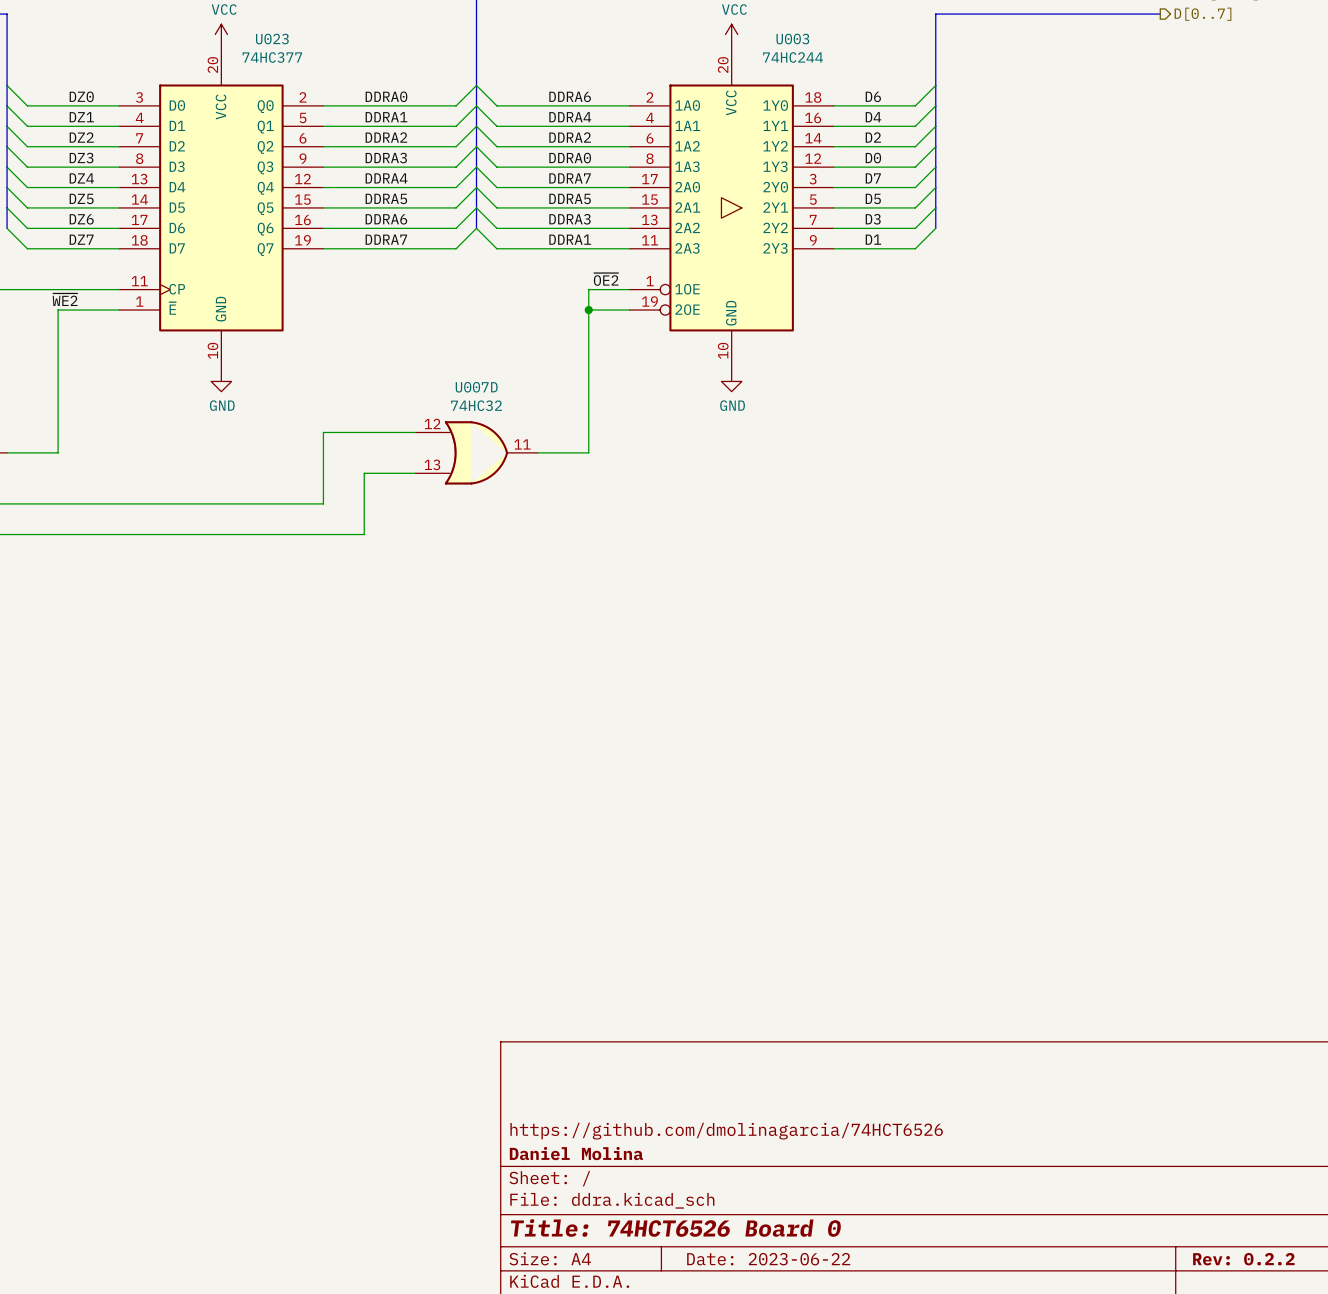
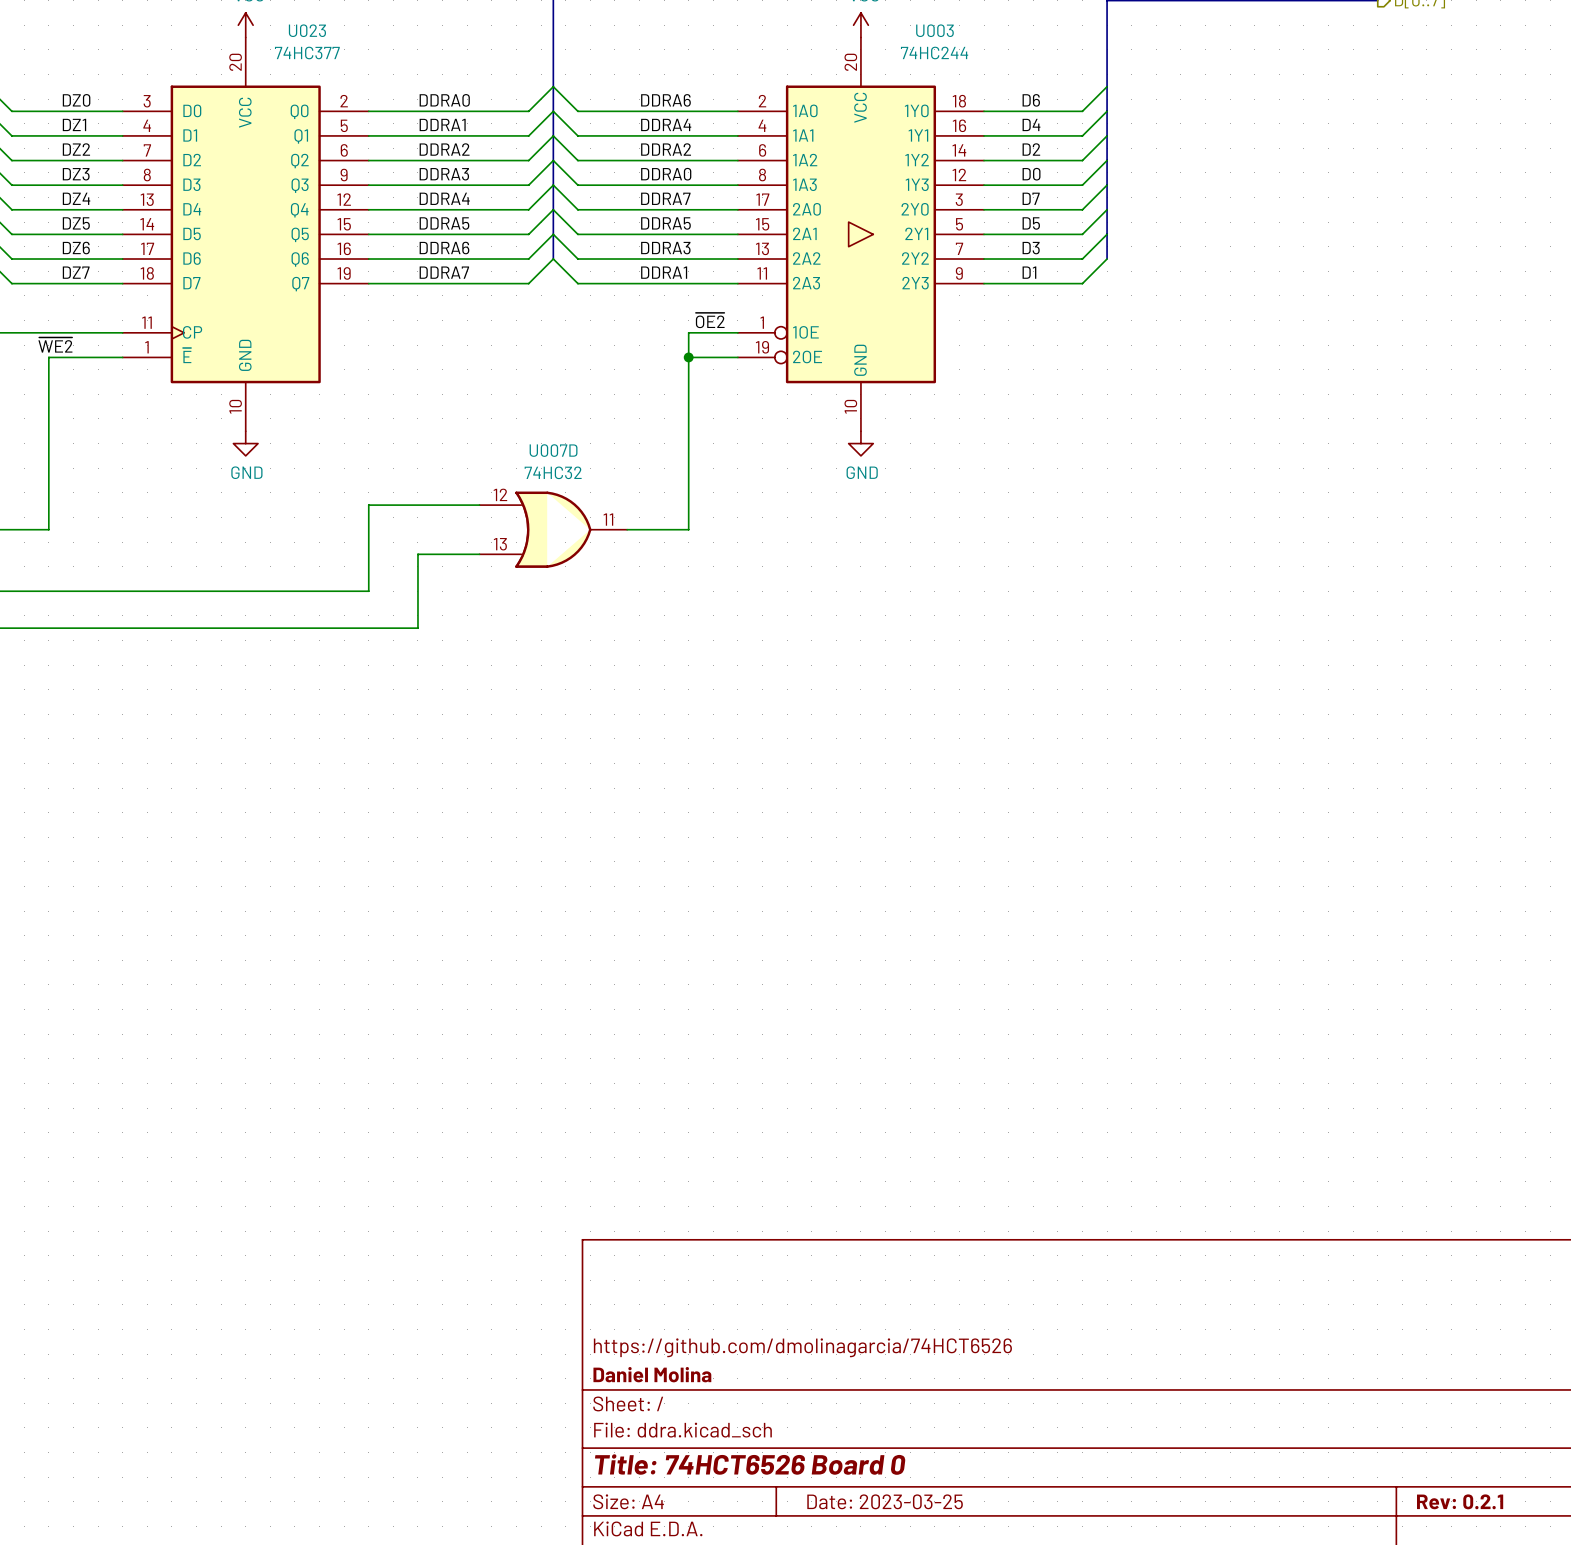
title block: Date: 2023-06-22 (768, 1259) -> Date: 2023-03-25 (885, 1501)
title block: Rev: 0.2.2 (1243, 1259) -> Rev: 0.2.1 (1460, 1501)

